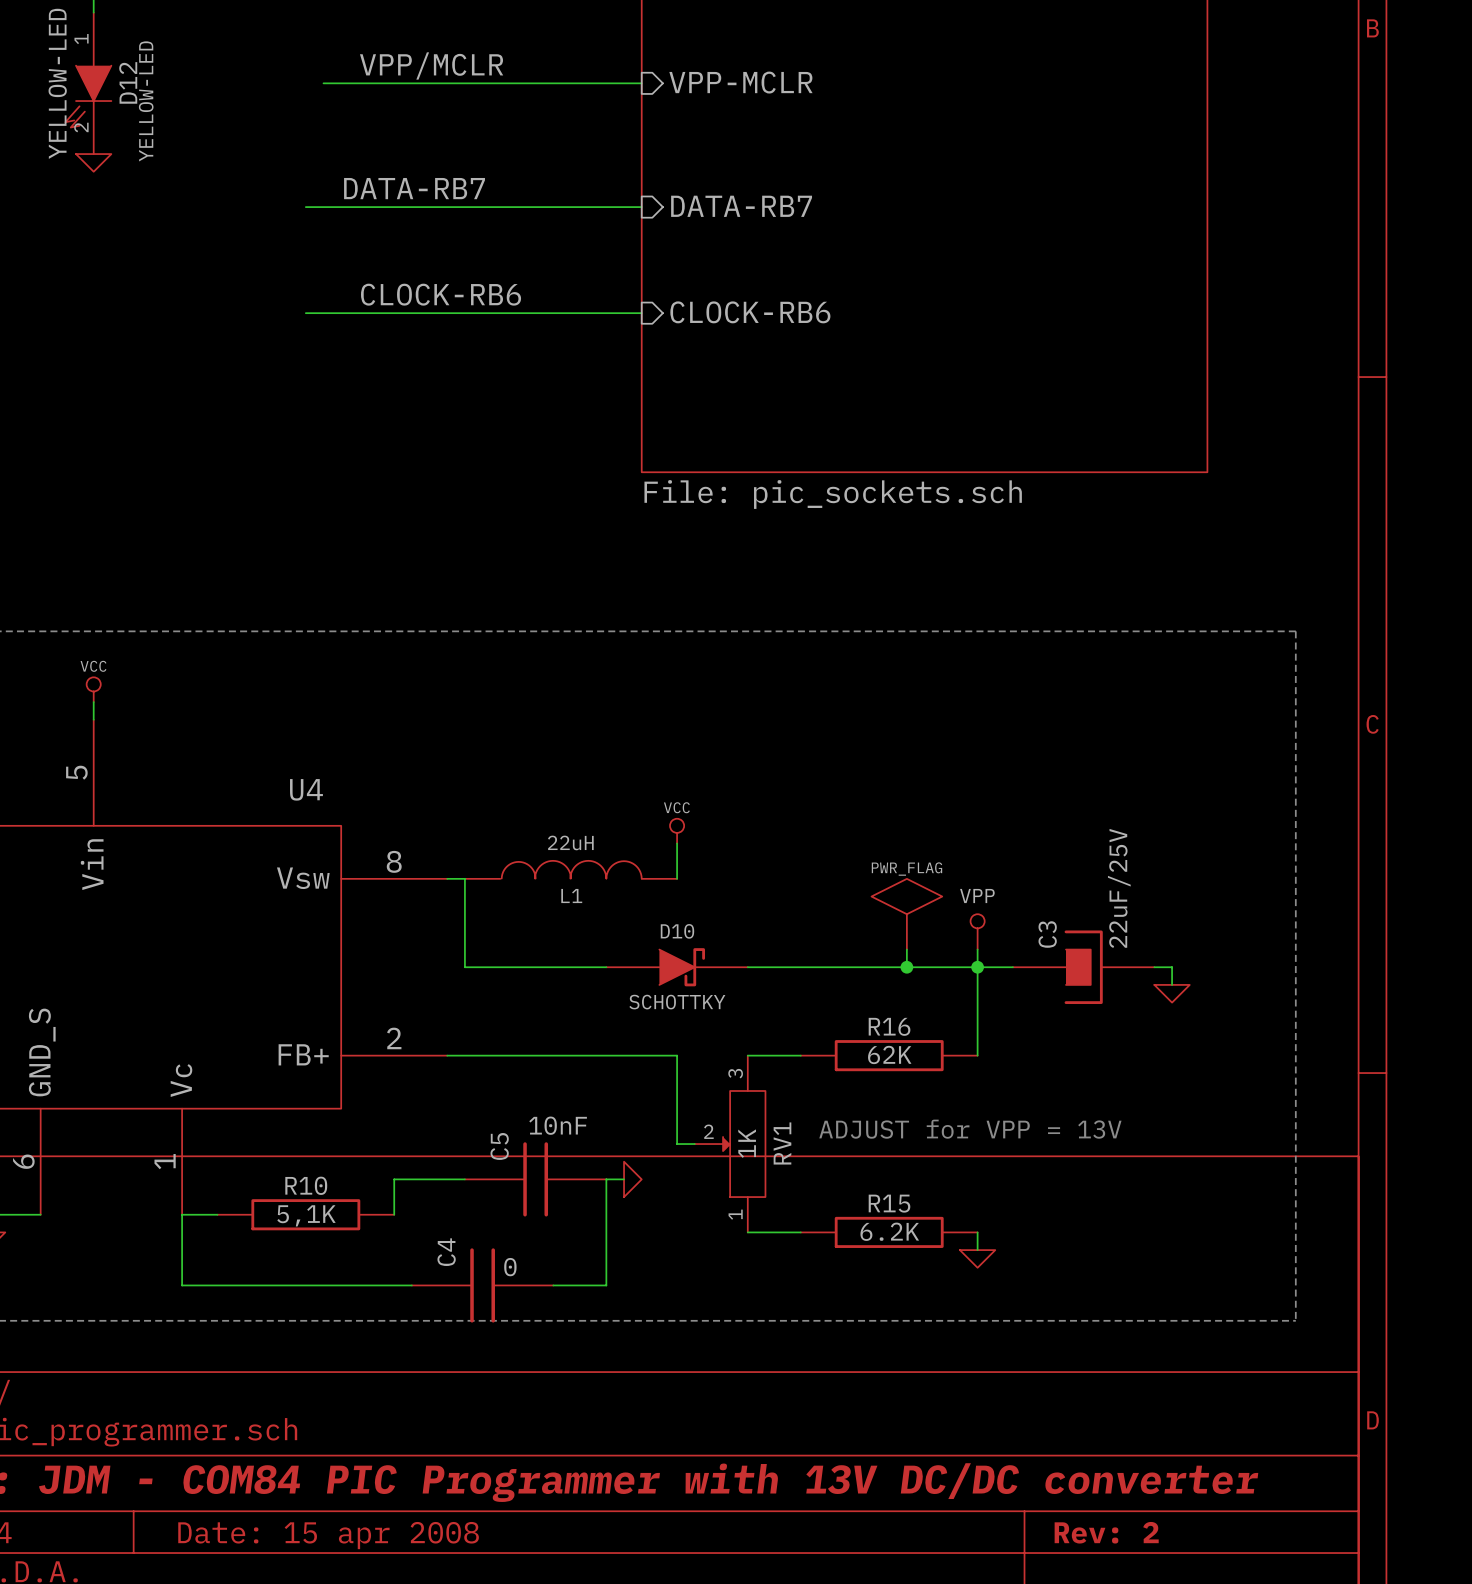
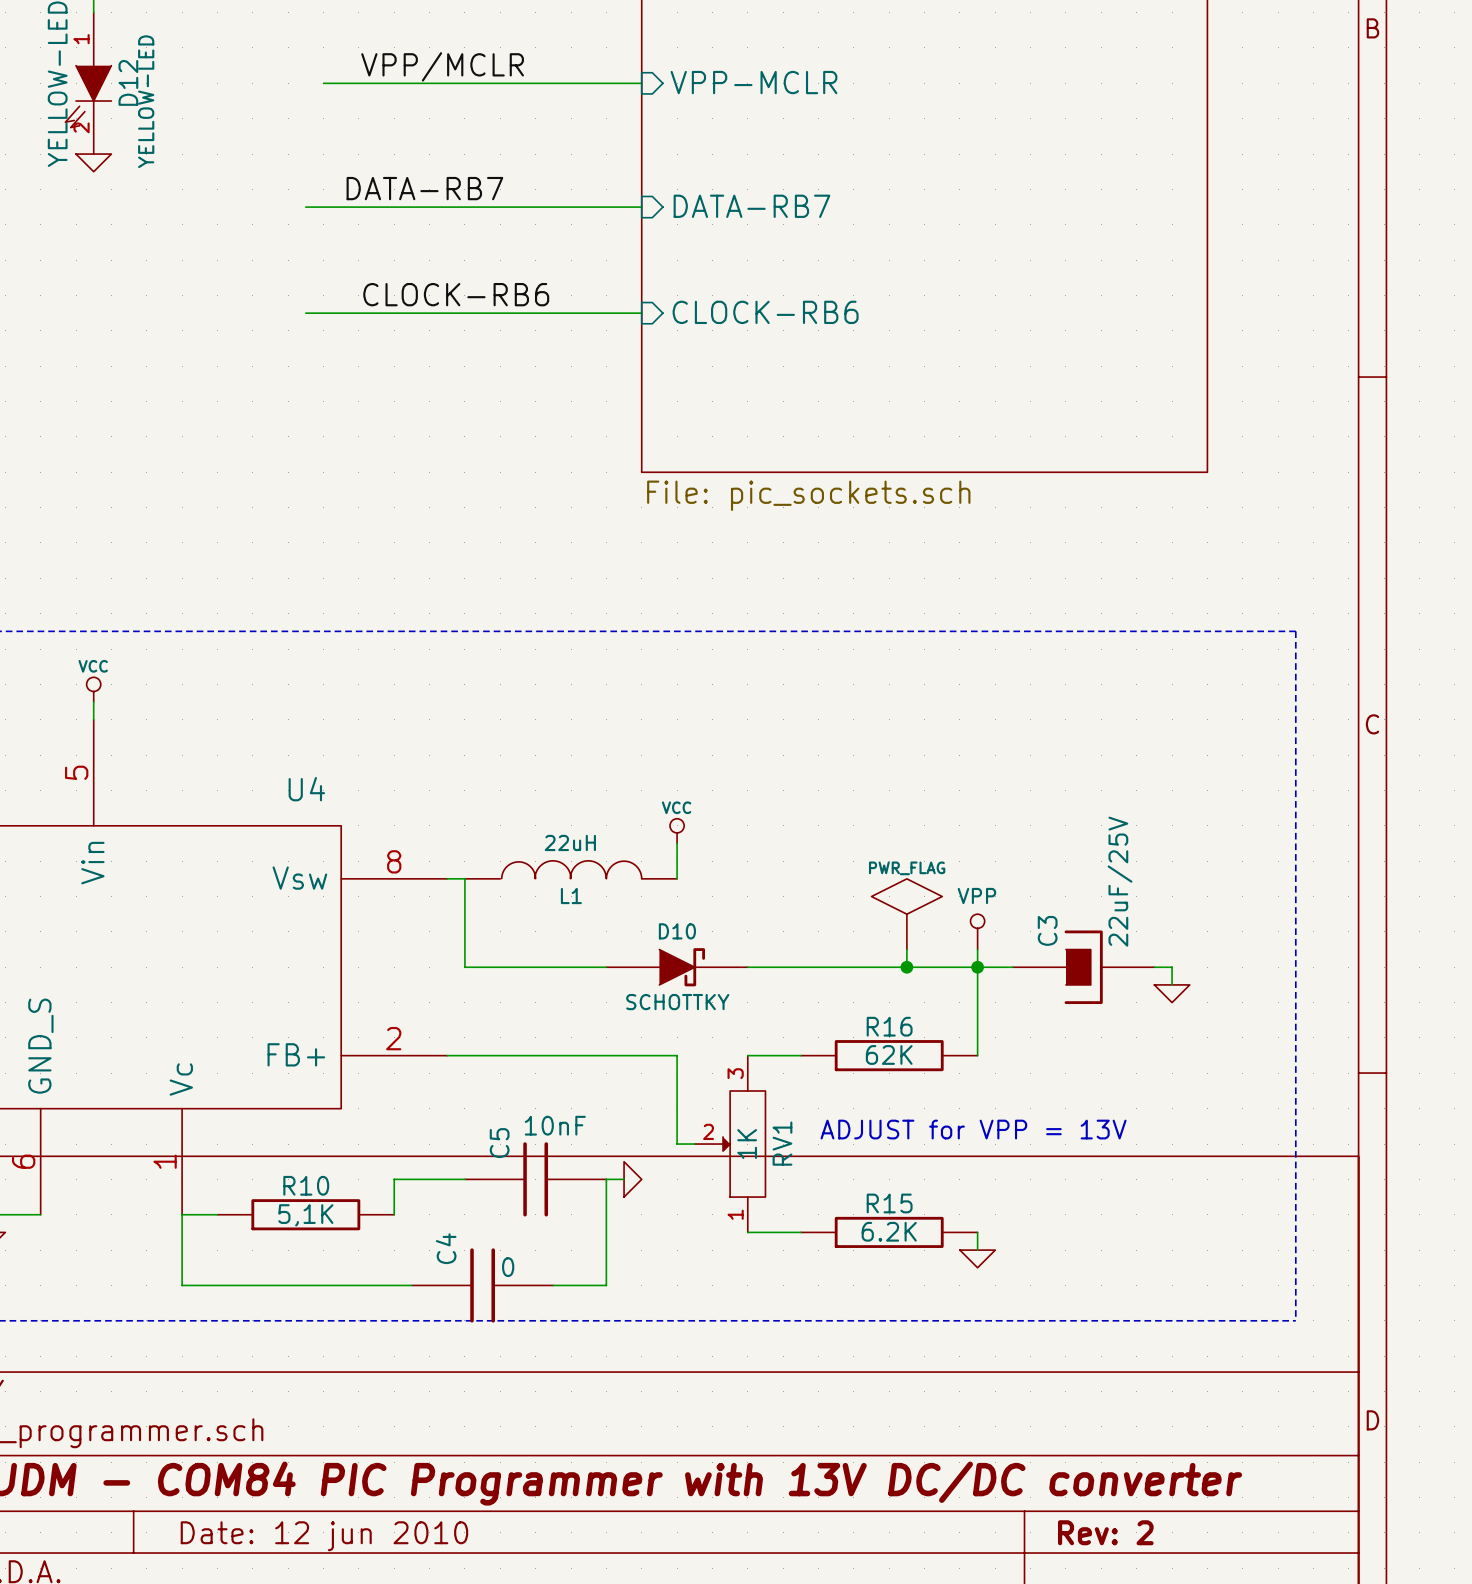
title block: Date: 15 apr 2008 (328, 1535) -> Date: 12 jun 2010 (324, 1536)

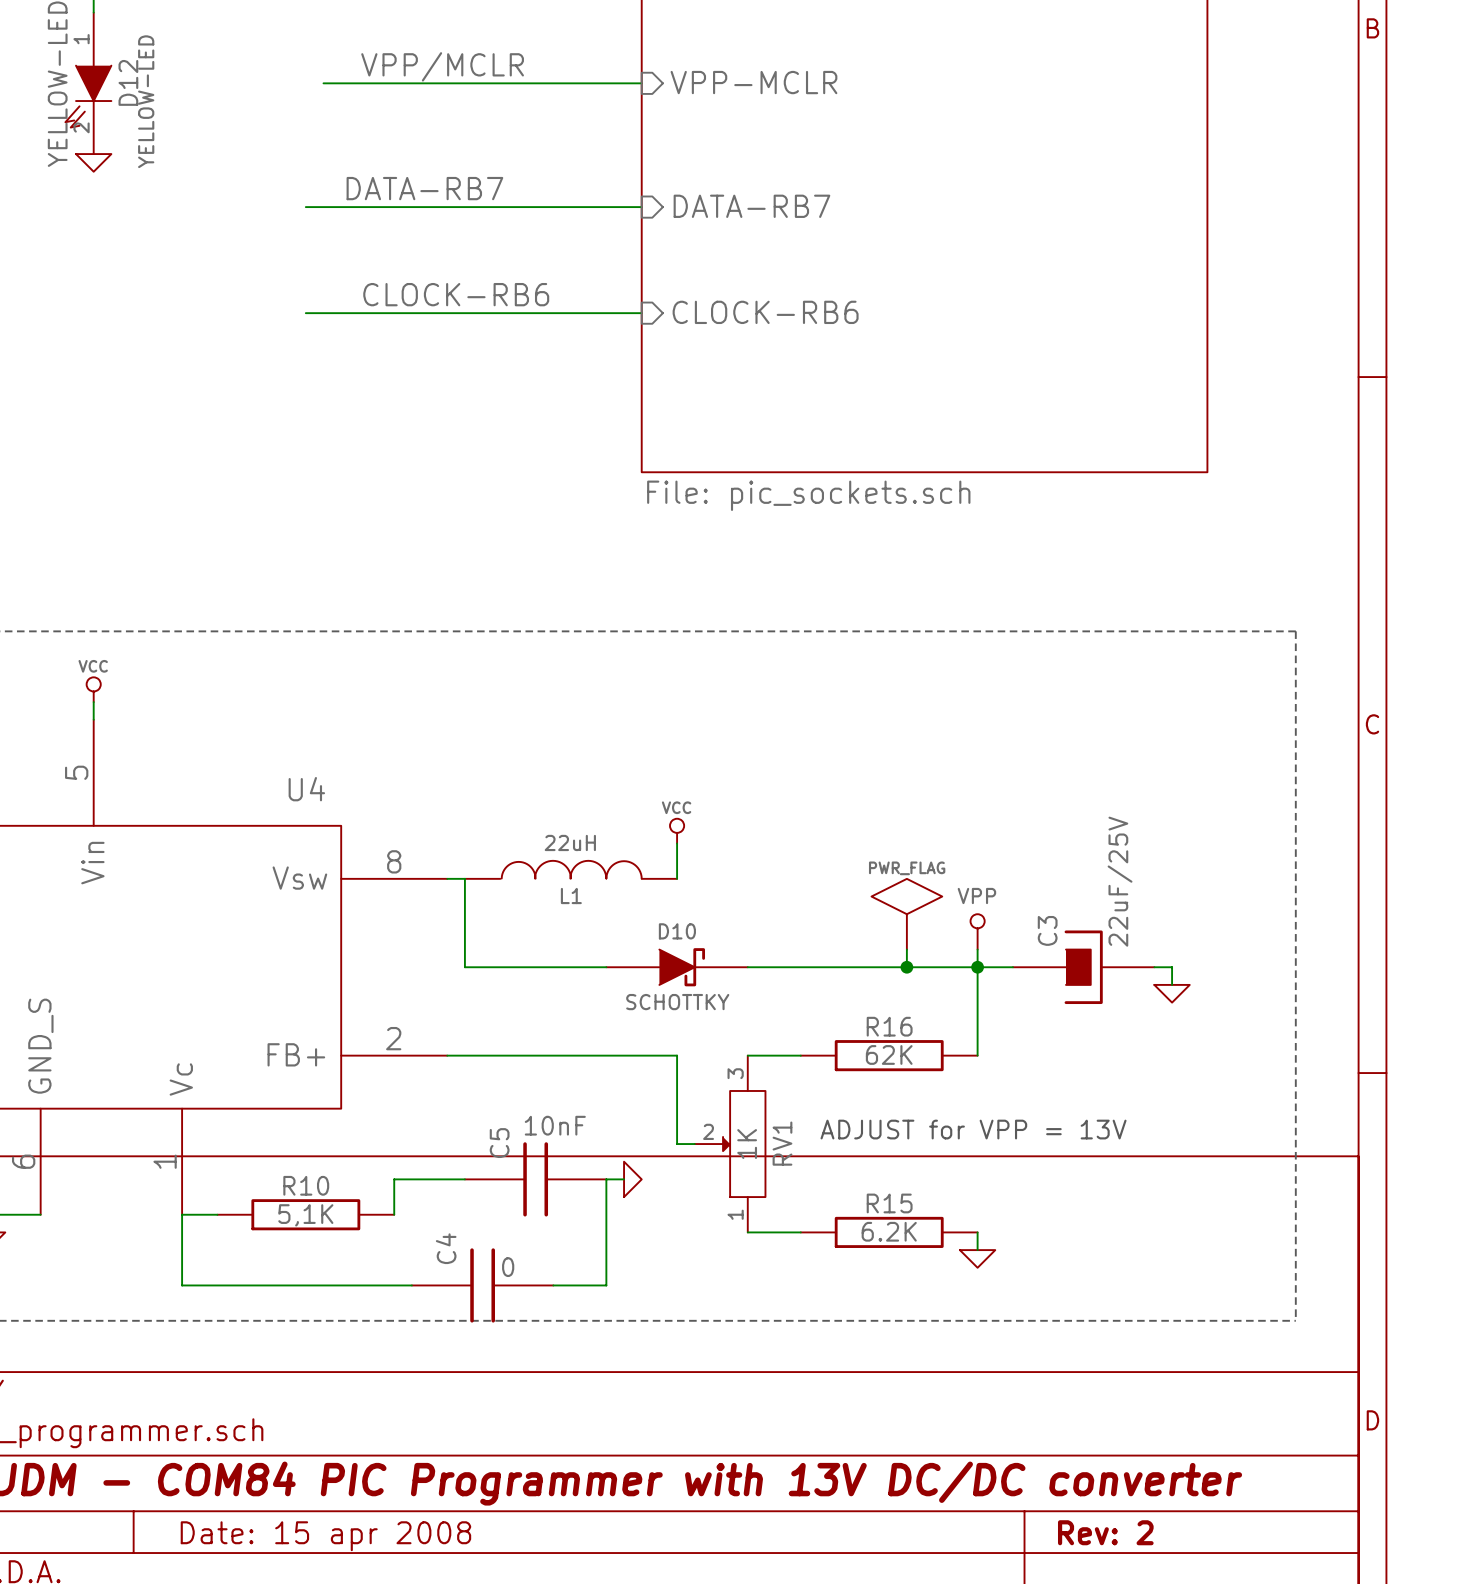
title block: Date: 12 jun 2010 (324, 1536) -> Date: 15 apr 2008 (325, 1536)

